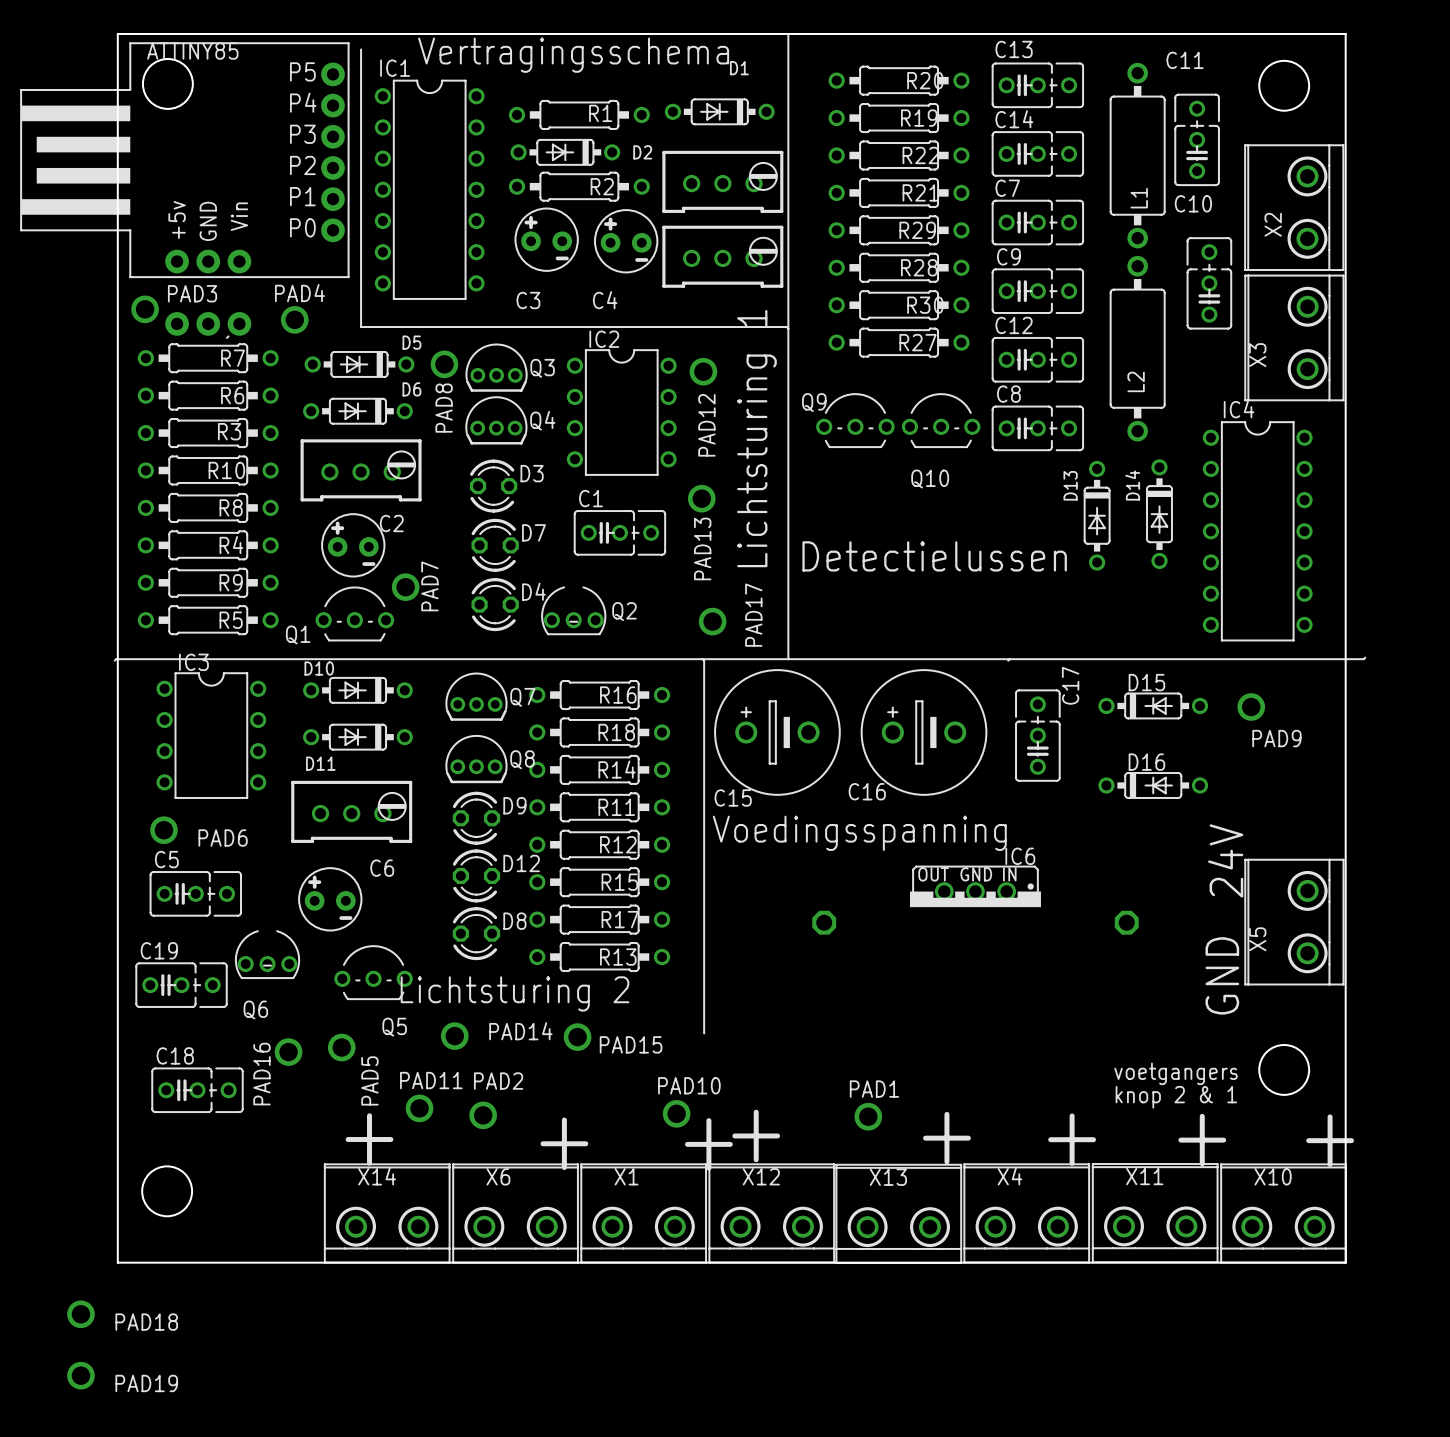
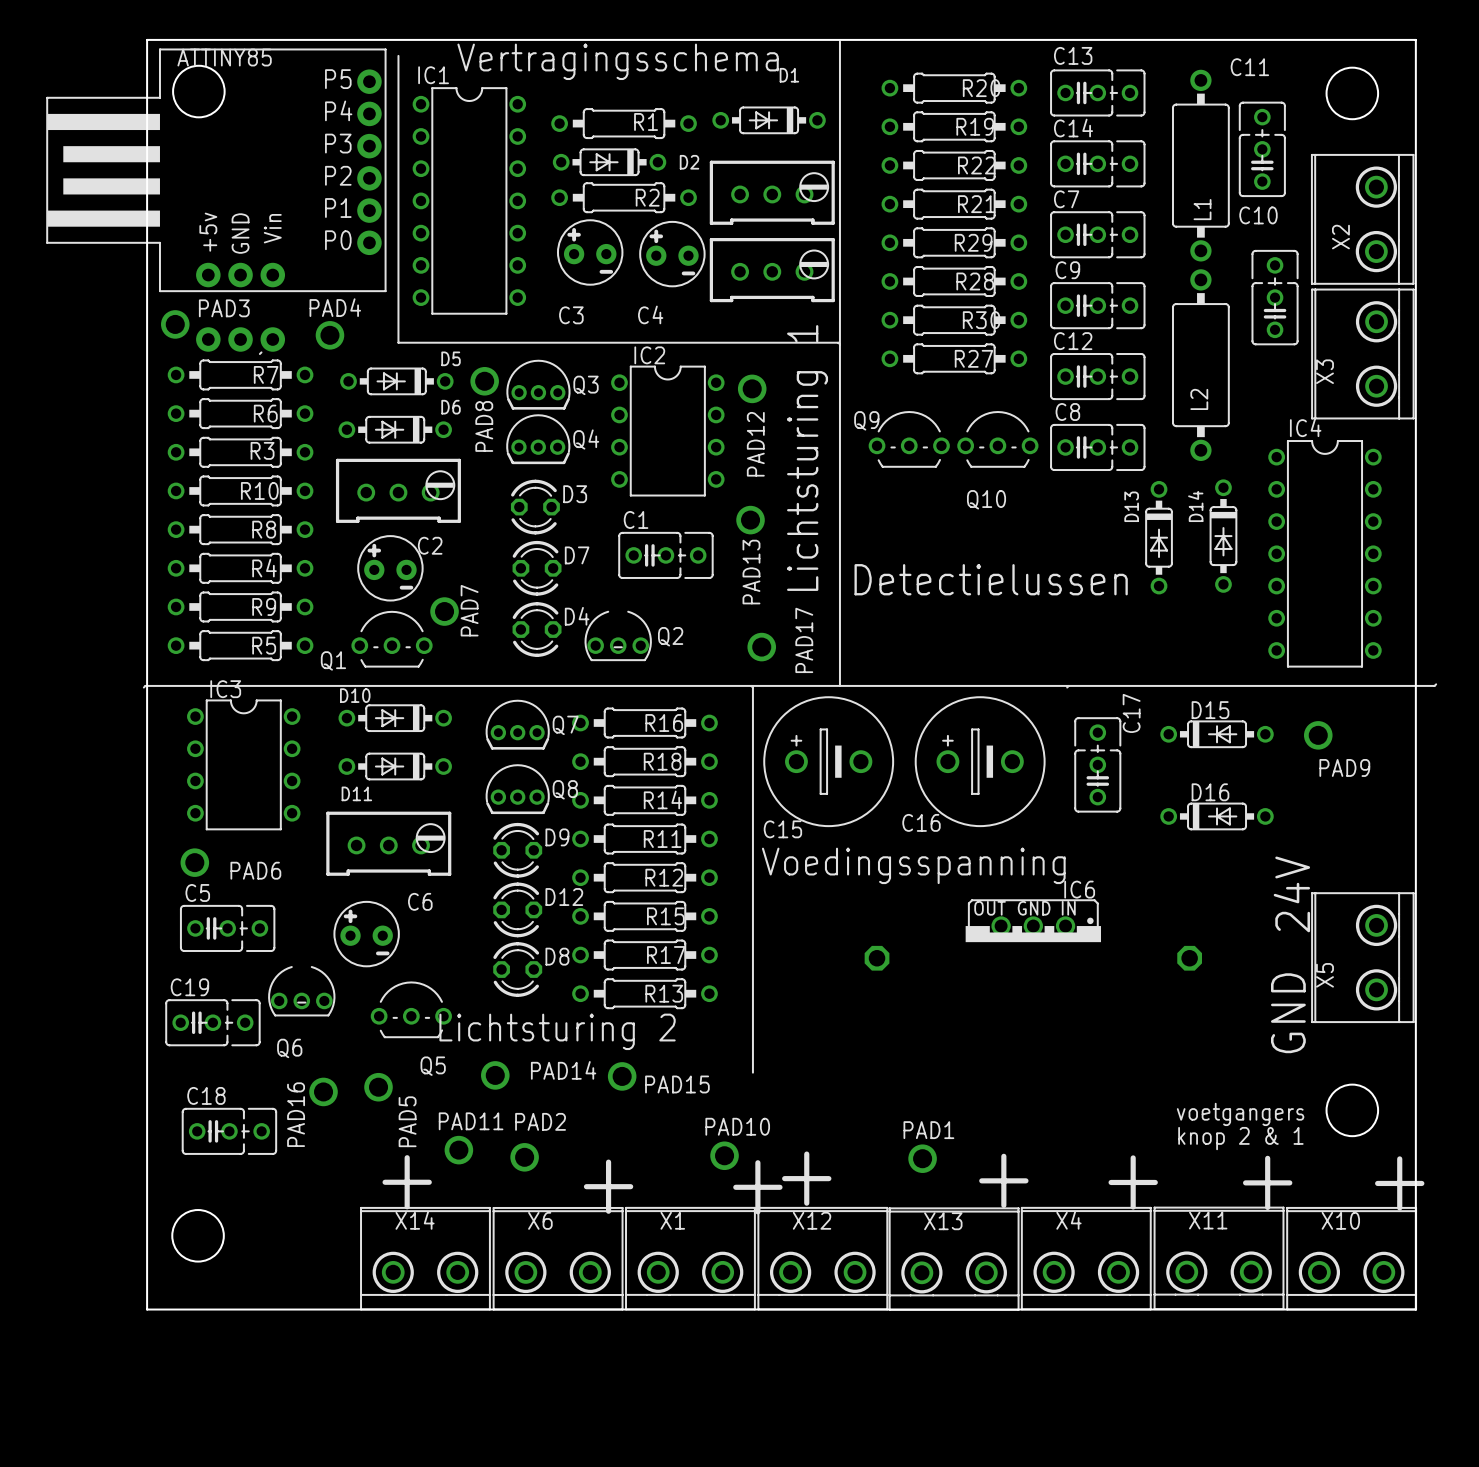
PAD18: (80, 1314) -> none
PAD19: (80, 1375) -> none

